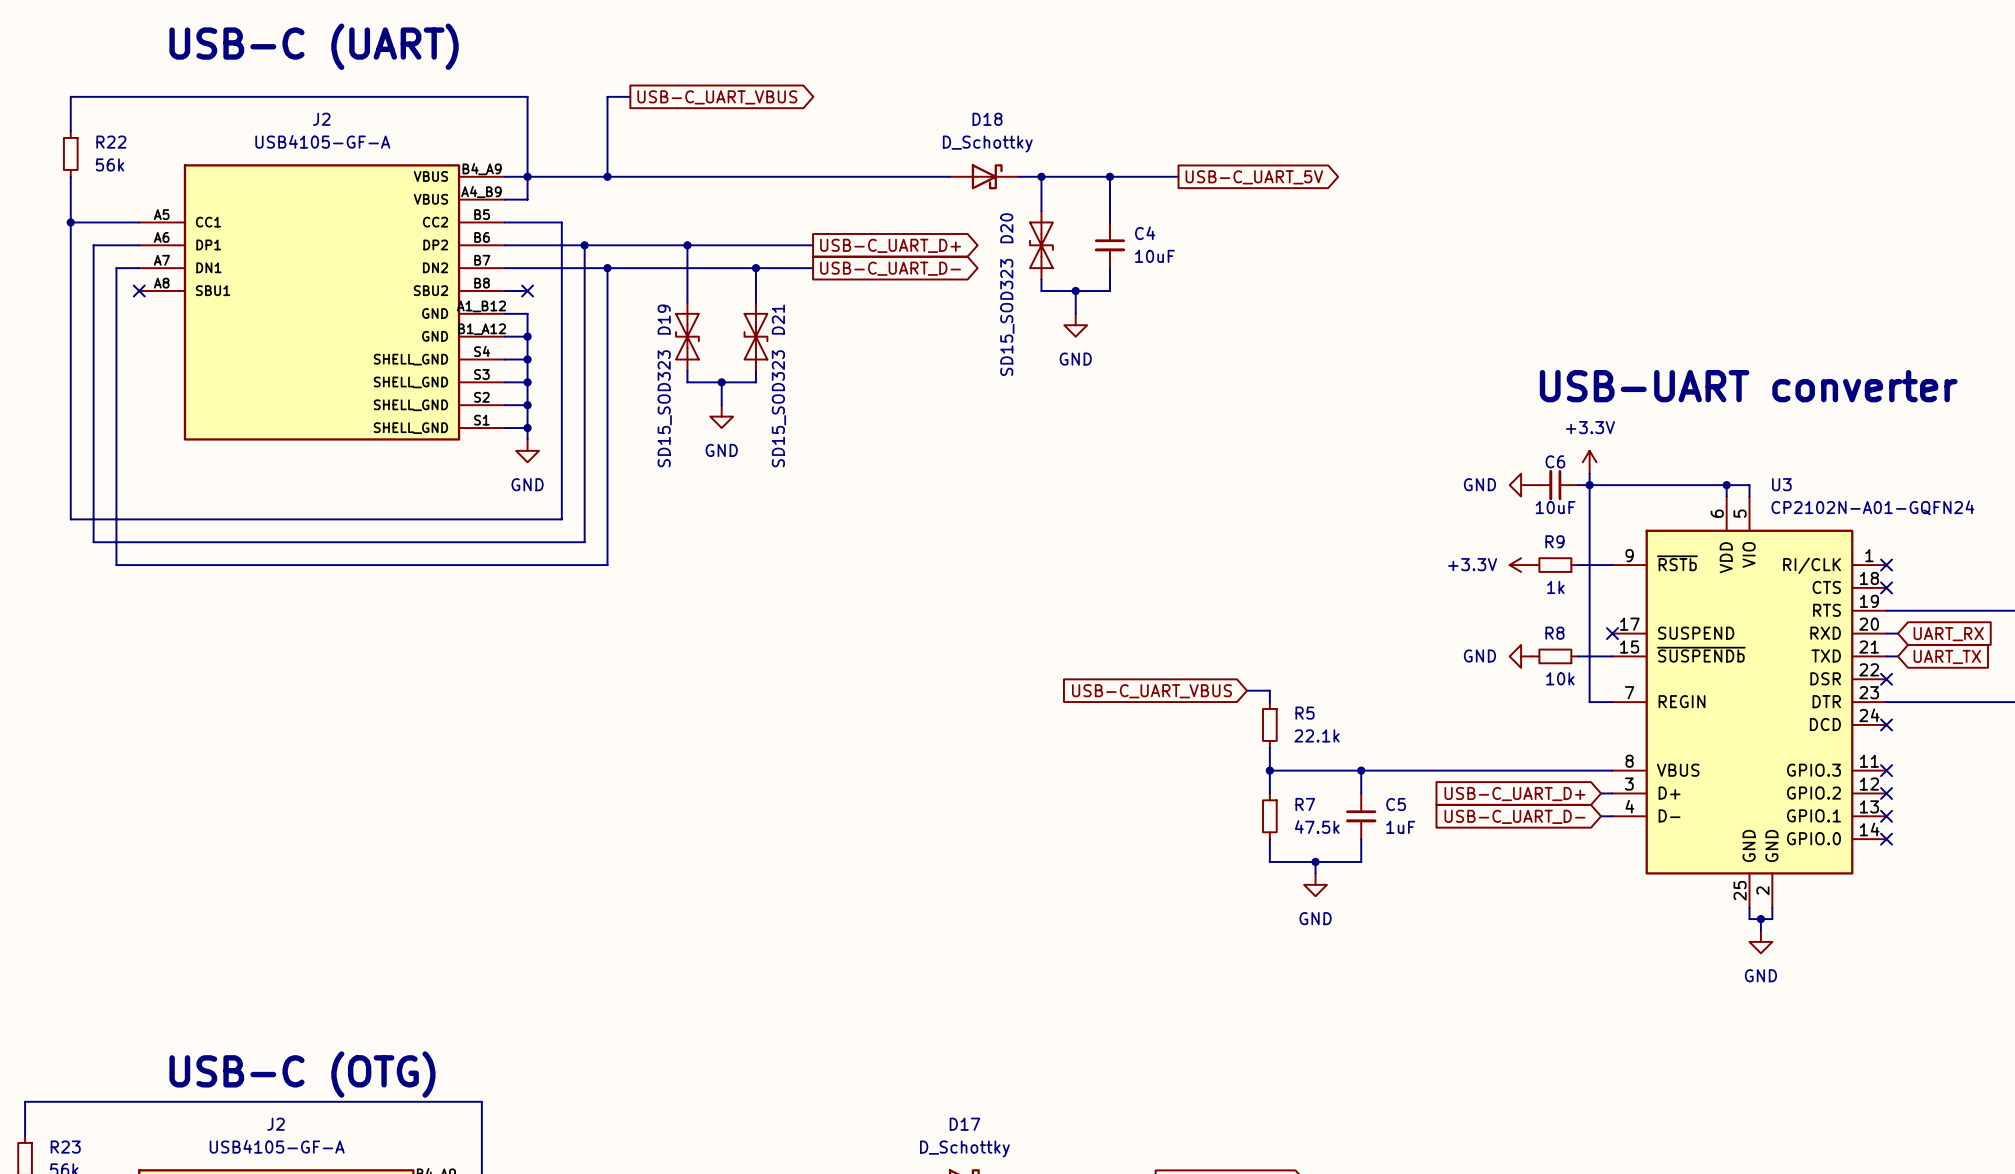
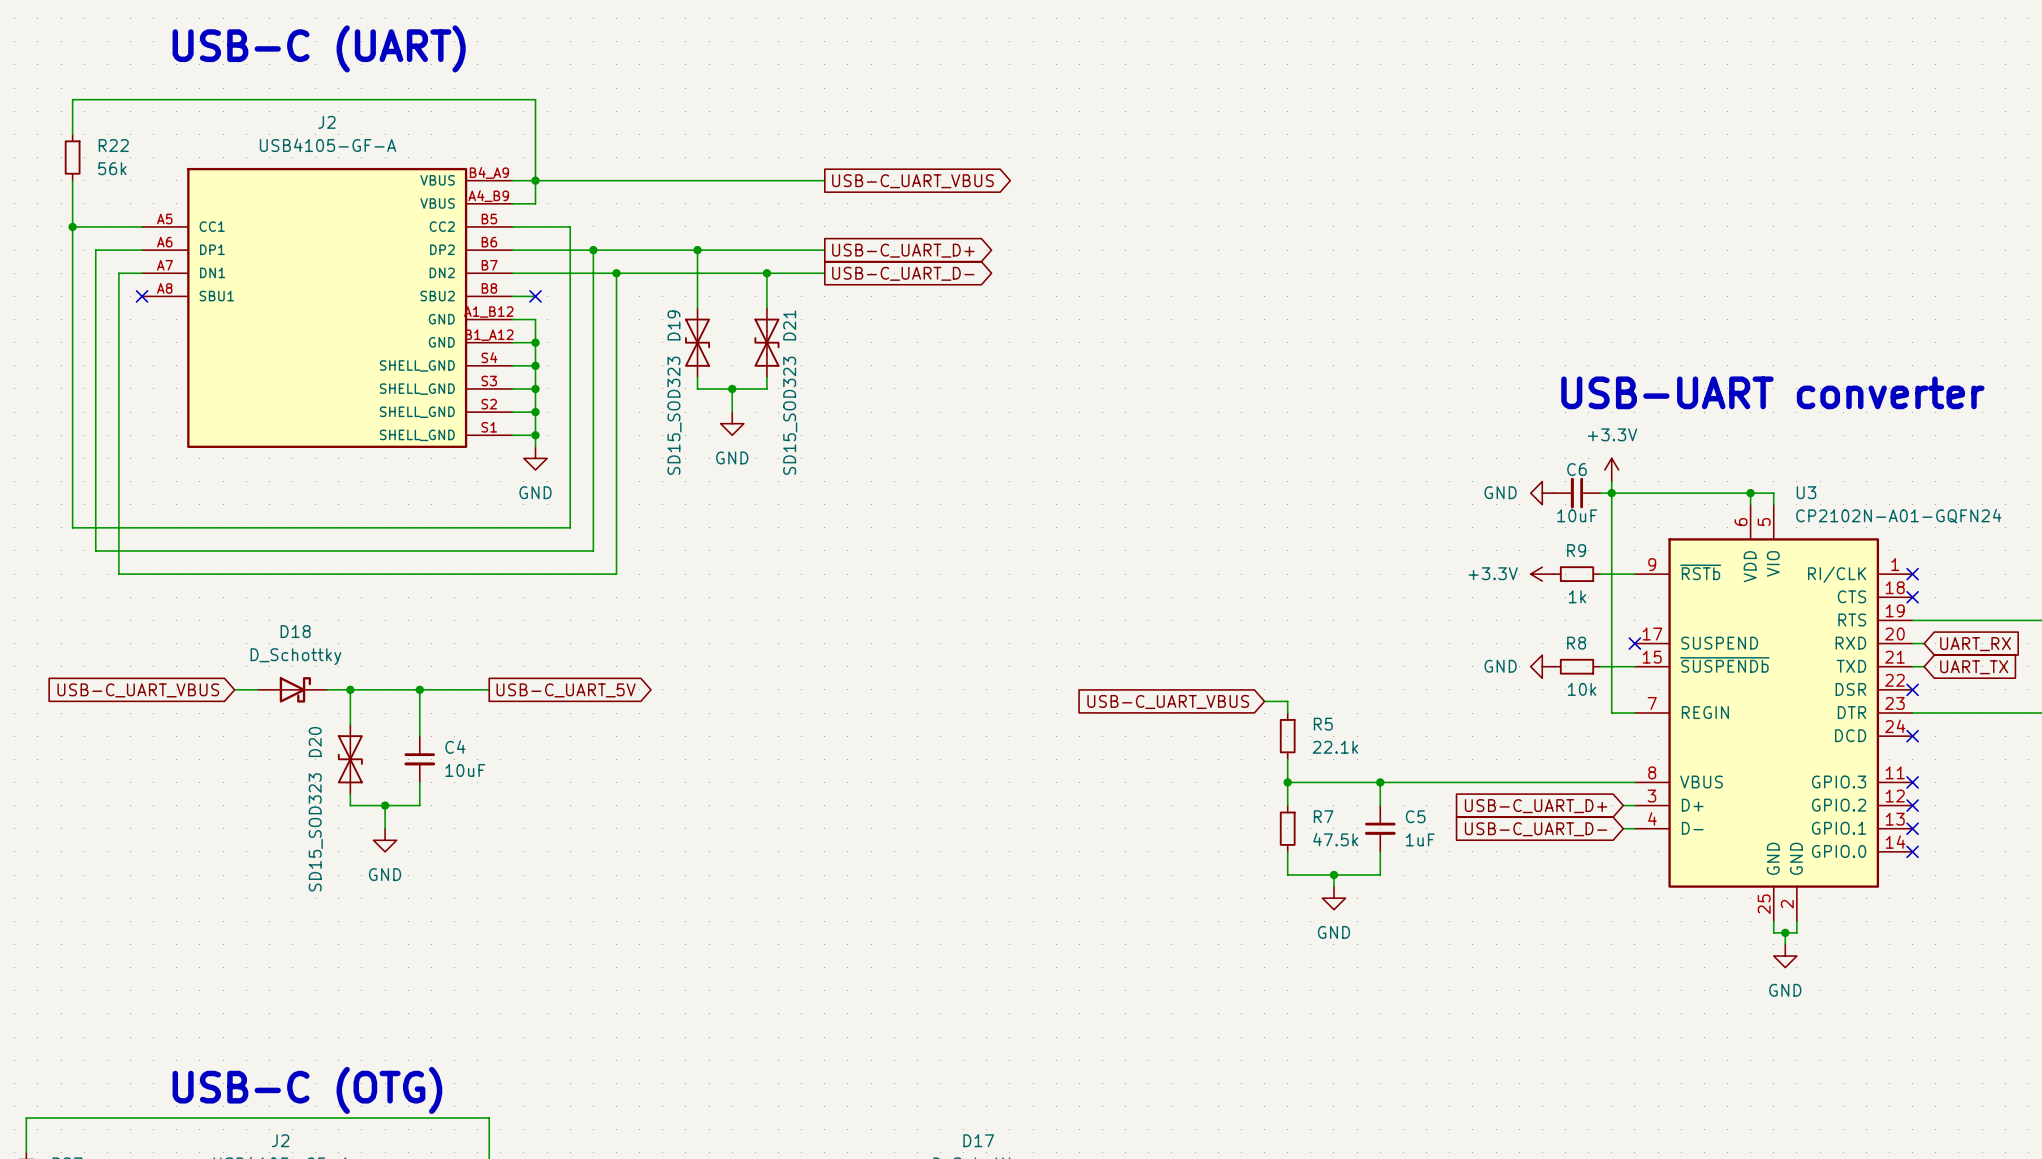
wire: (630, 96) (607, 96) (607, 176) -> none
global label position: USB-C_UART_VBUS (717, 97) -> USB-C_UART_VBUS (913, 181)
junction: (607, 176) -> none
wire: (813, 176) (950, 176) -> none
D18 position: (984, 176) -> (292, 689)
wire: (1018, 176) (1178, 176) -> none
wire: (1041, 176) (1041, 211) -> none
junction: (1041, 176) -> none
wire: (1109, 176) (1109, 222) -> none
junction: (1109, 176) -> none
global label: USB-C_UART_5V (1254, 177) -> none
D20 position: (1041, 245) -> (350, 759)
C4 position: (1109, 245) -> (419, 759)
wire: (1109, 268) (1109, 290) (1041, 290) (1041, 279) -> none
wire: (1075, 290) (1075, 313) -> none
junction: (1075, 290) -> none
power symbol: GND (1075, 325) -> none
global label: none -> USB-C_UART_VBUS (138, 690)
wire: none -> (234, 689) (257, 689)
wire: none -> (327, 689) (489, 689)
wire: none -> (350, 689) (350, 724)
junction: none -> (350, 689)
wire: none -> (419, 689) (419, 736)
junction: none -> (419, 689)
global label: none -> USB-C_UART_5V (566, 690)
wire: none -> (419, 782) (419, 805) (350, 805) (350, 794)
wire: none -> (385, 805) (385, 828)
junction: none -> (385, 805)
power symbol: none -> GND (385, 840)

